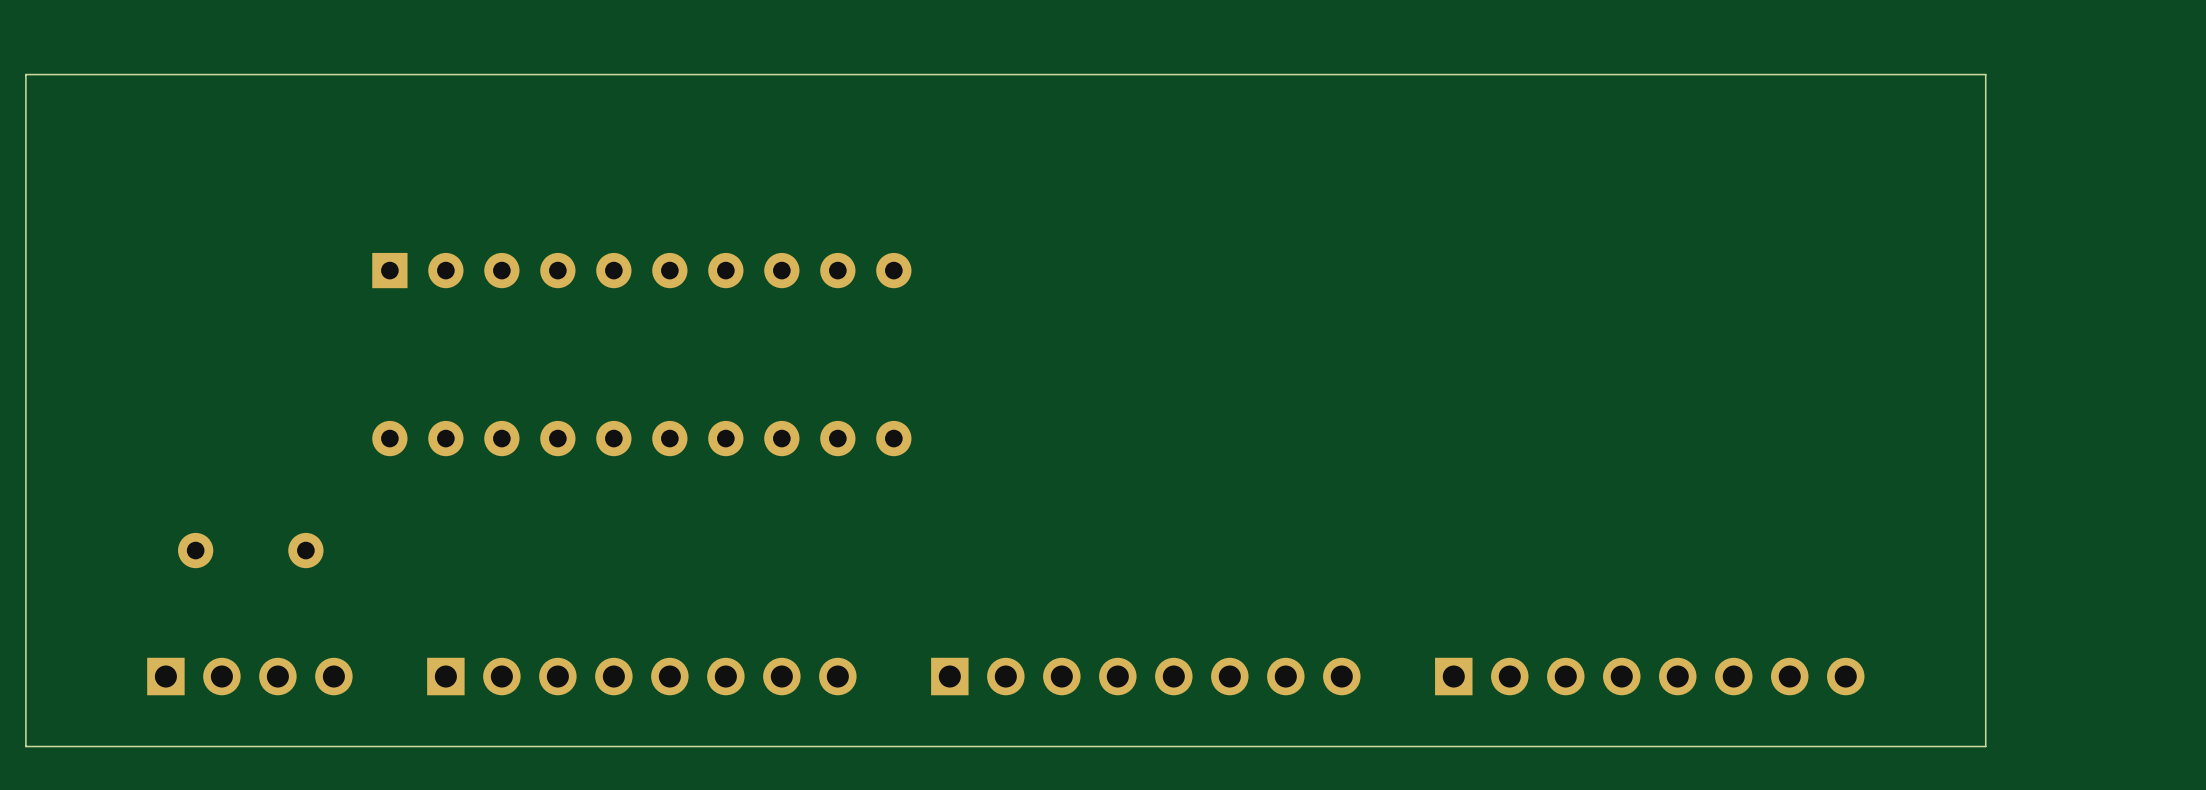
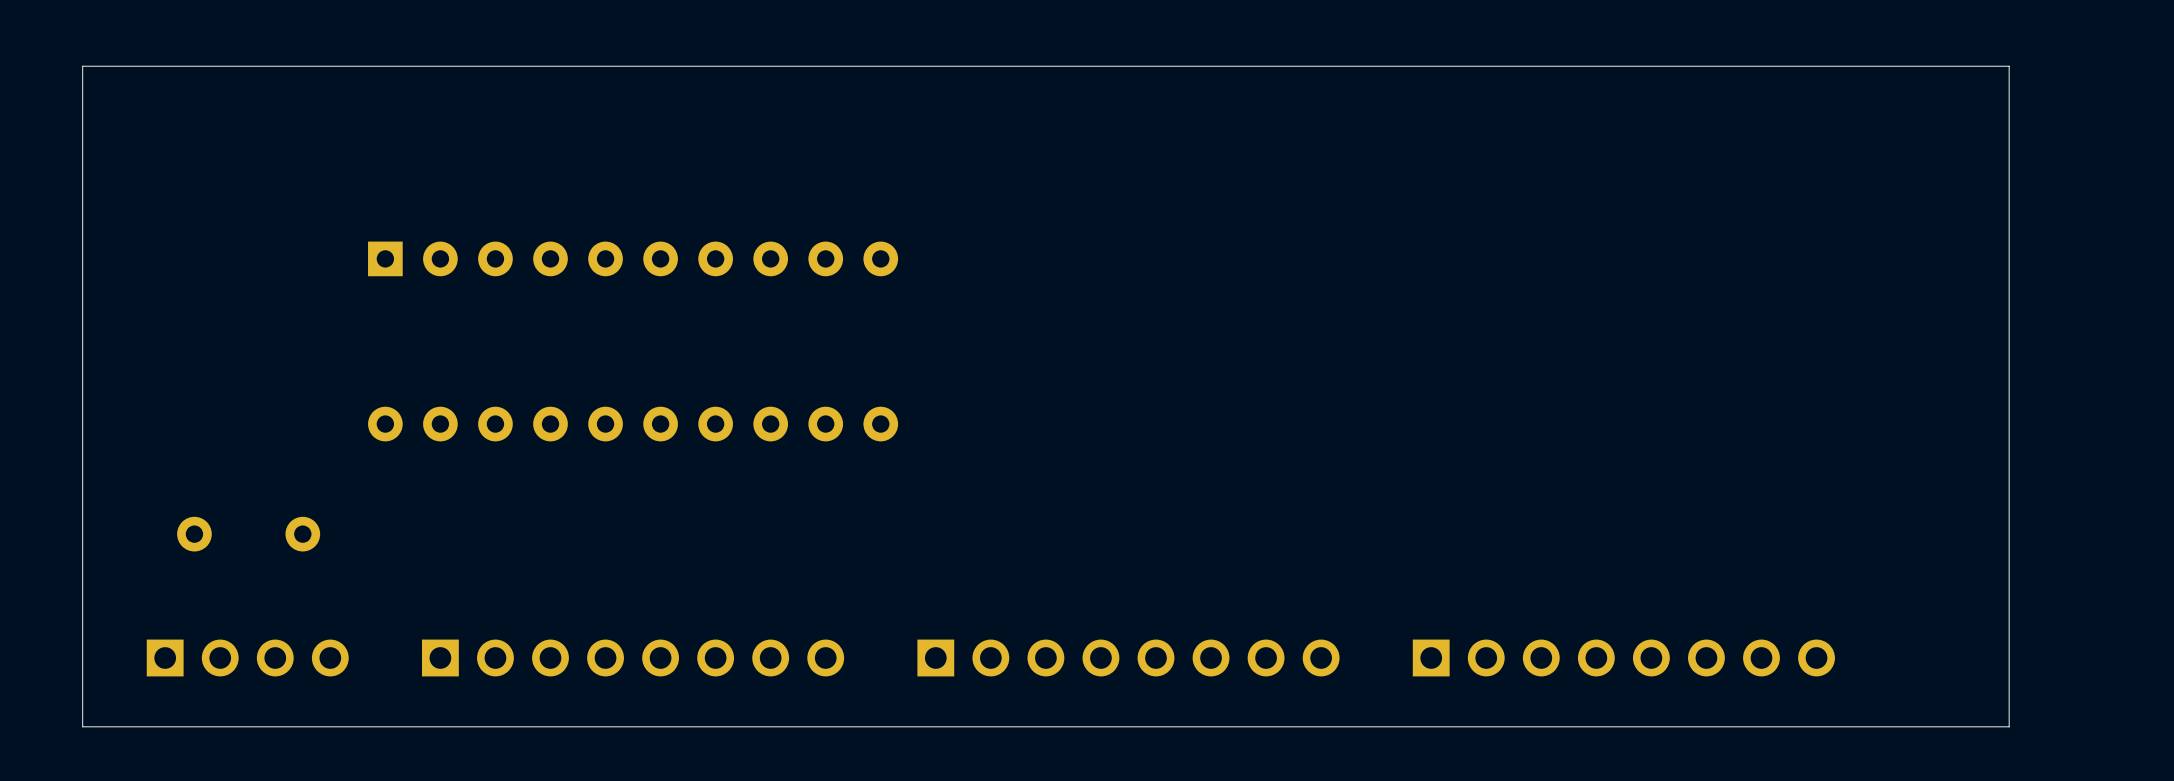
board edge: (81, 74) (25, 74) (25, 746) (81, 746) -> (82, 66) (82, 726)
board edge: (1985, 74) (1985, 746) -> (1954, 66) (2009, 66) (2009, 726) (1954, 726)

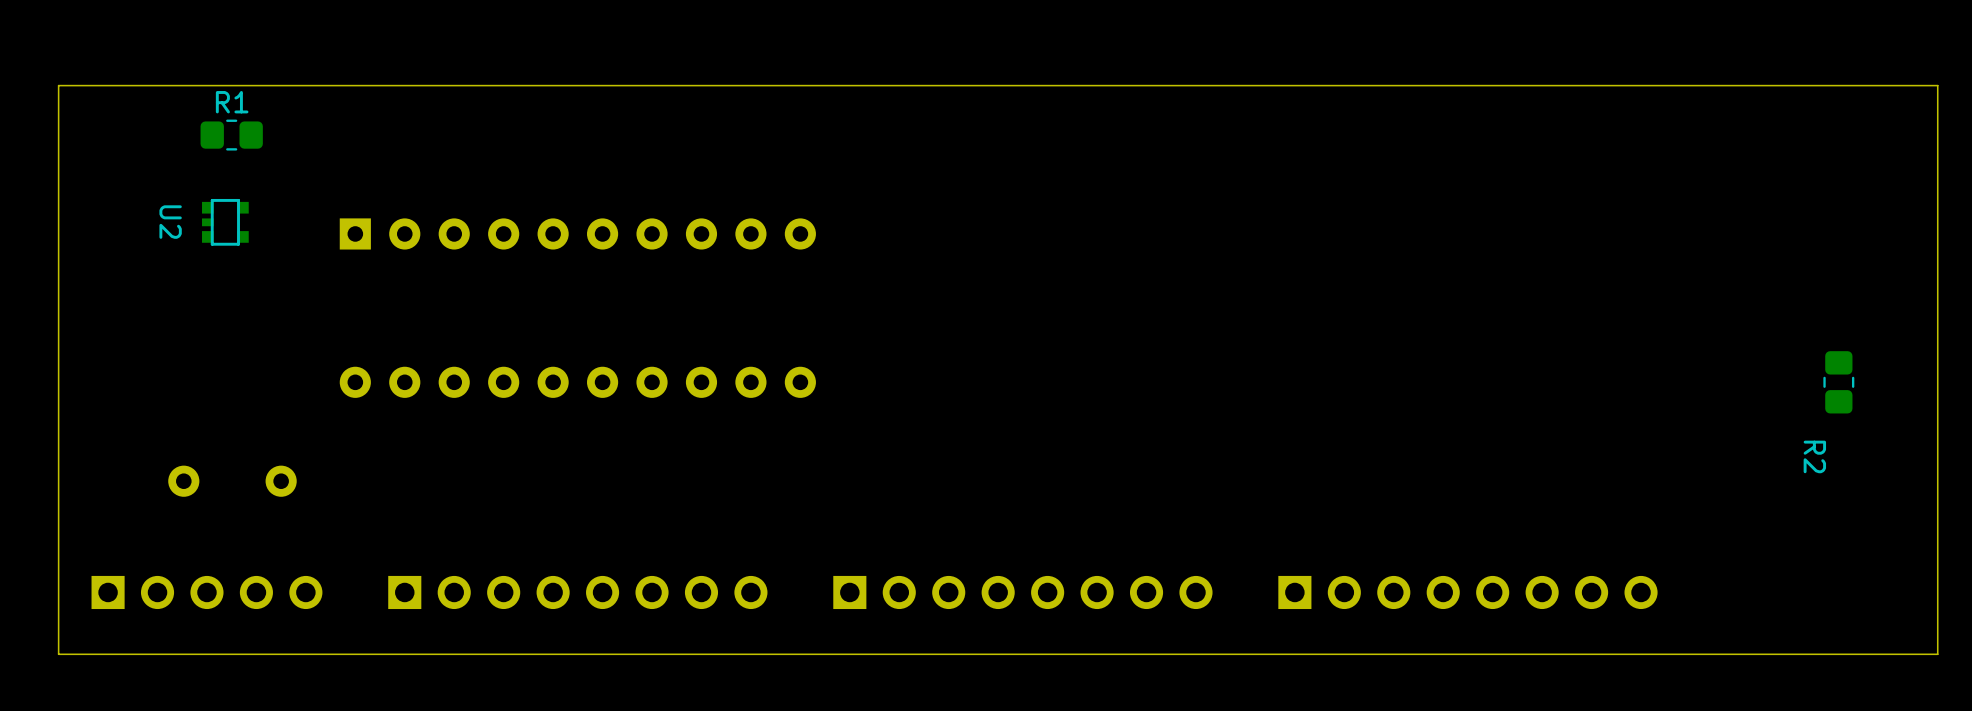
R1: none -> (231, 135)
U2: none -> (225, 222)
R2: none -> (1838, 382)
part: none -> (206, 592)
part: (247, 657) -> none
board edge: (2009, 726) (2009, 66) (82, 66) (82, 726) -> (1814, 654) (1937, 654) (1937, 85) (58, 85) (58, 654) (83, 654)

